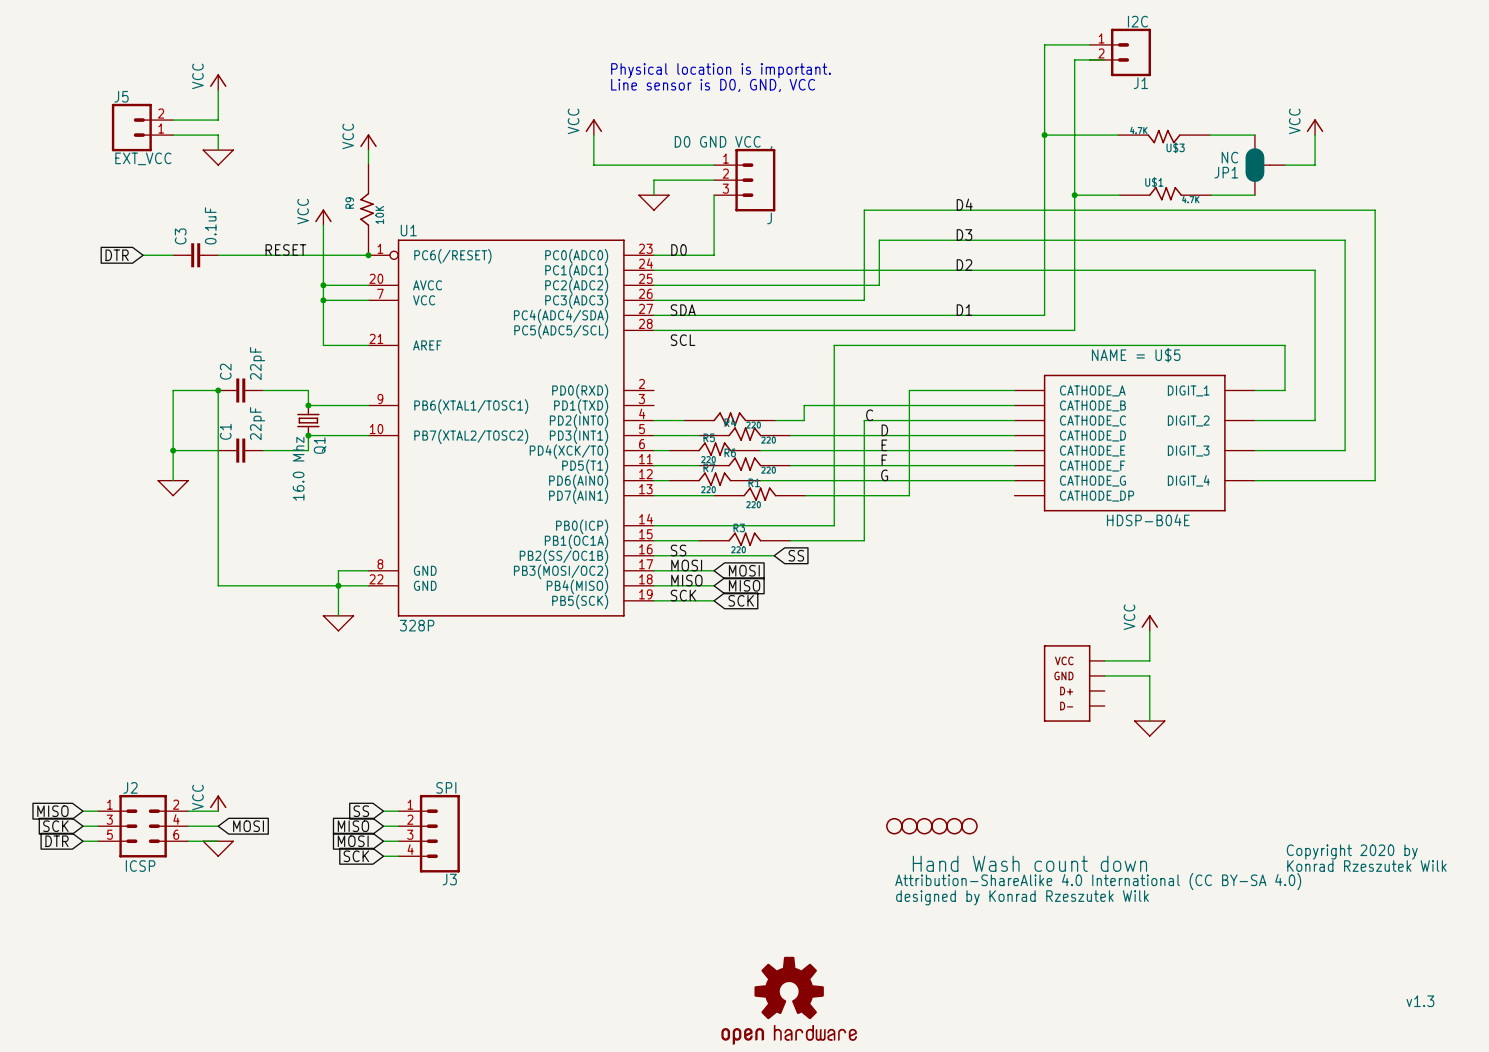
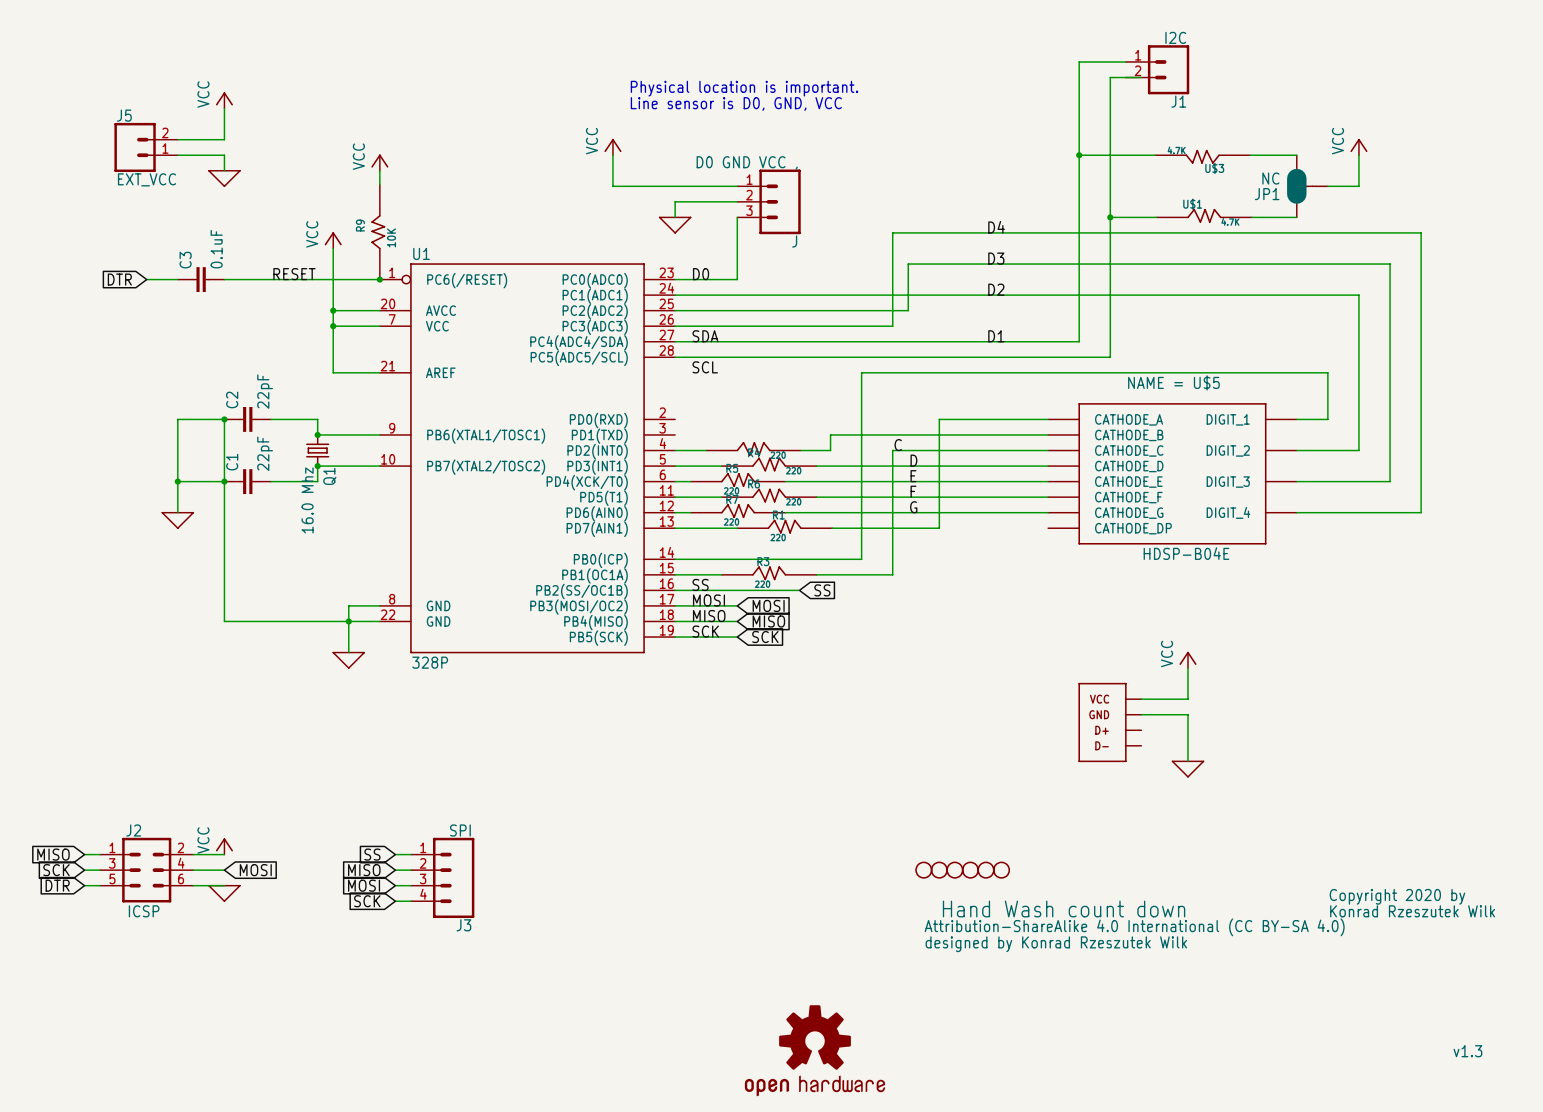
junction: none -> (224, 481)

